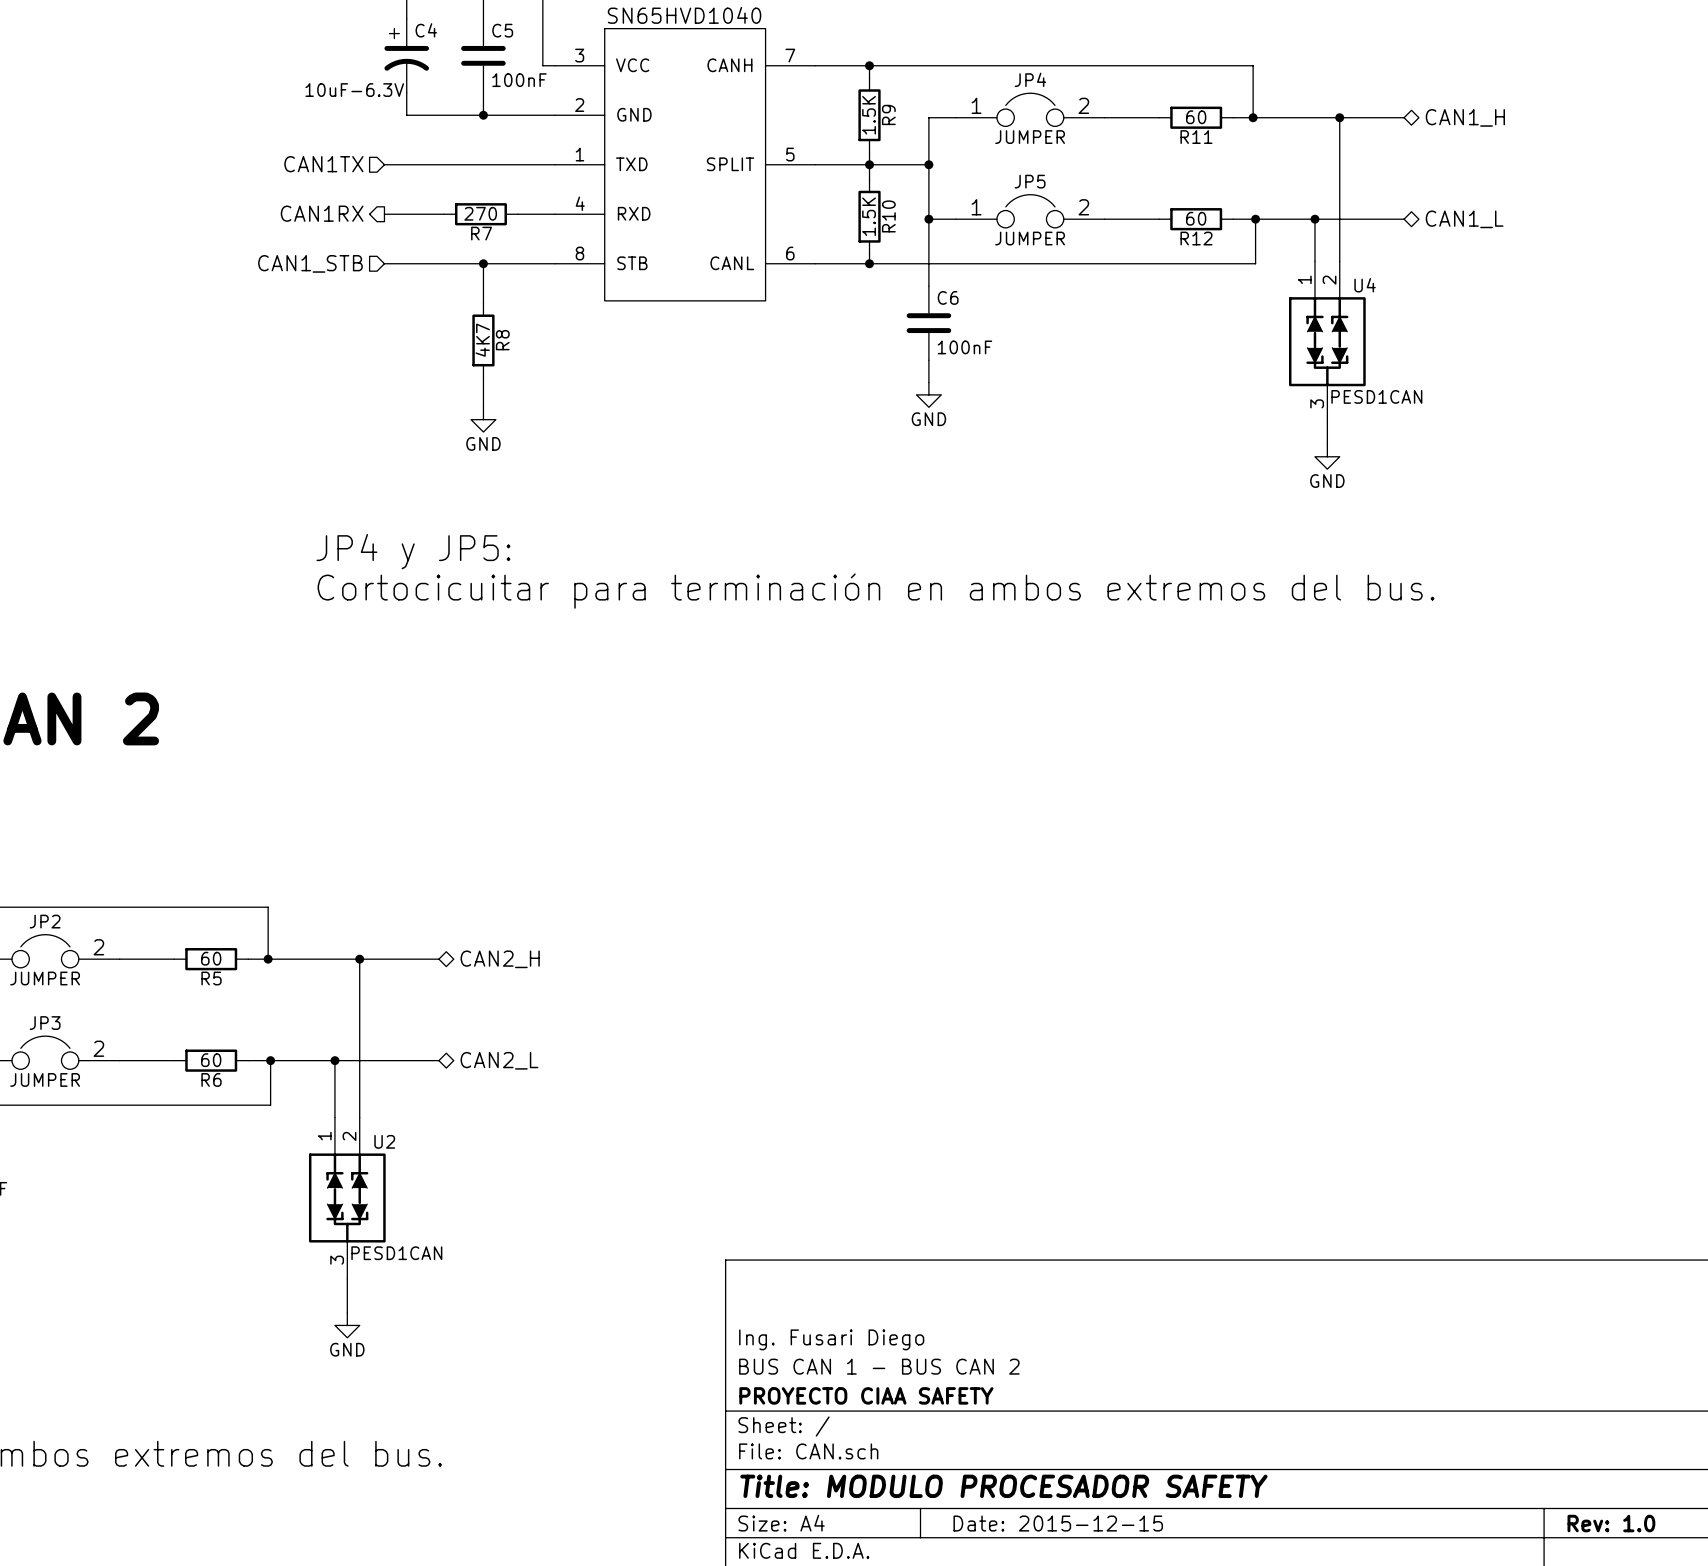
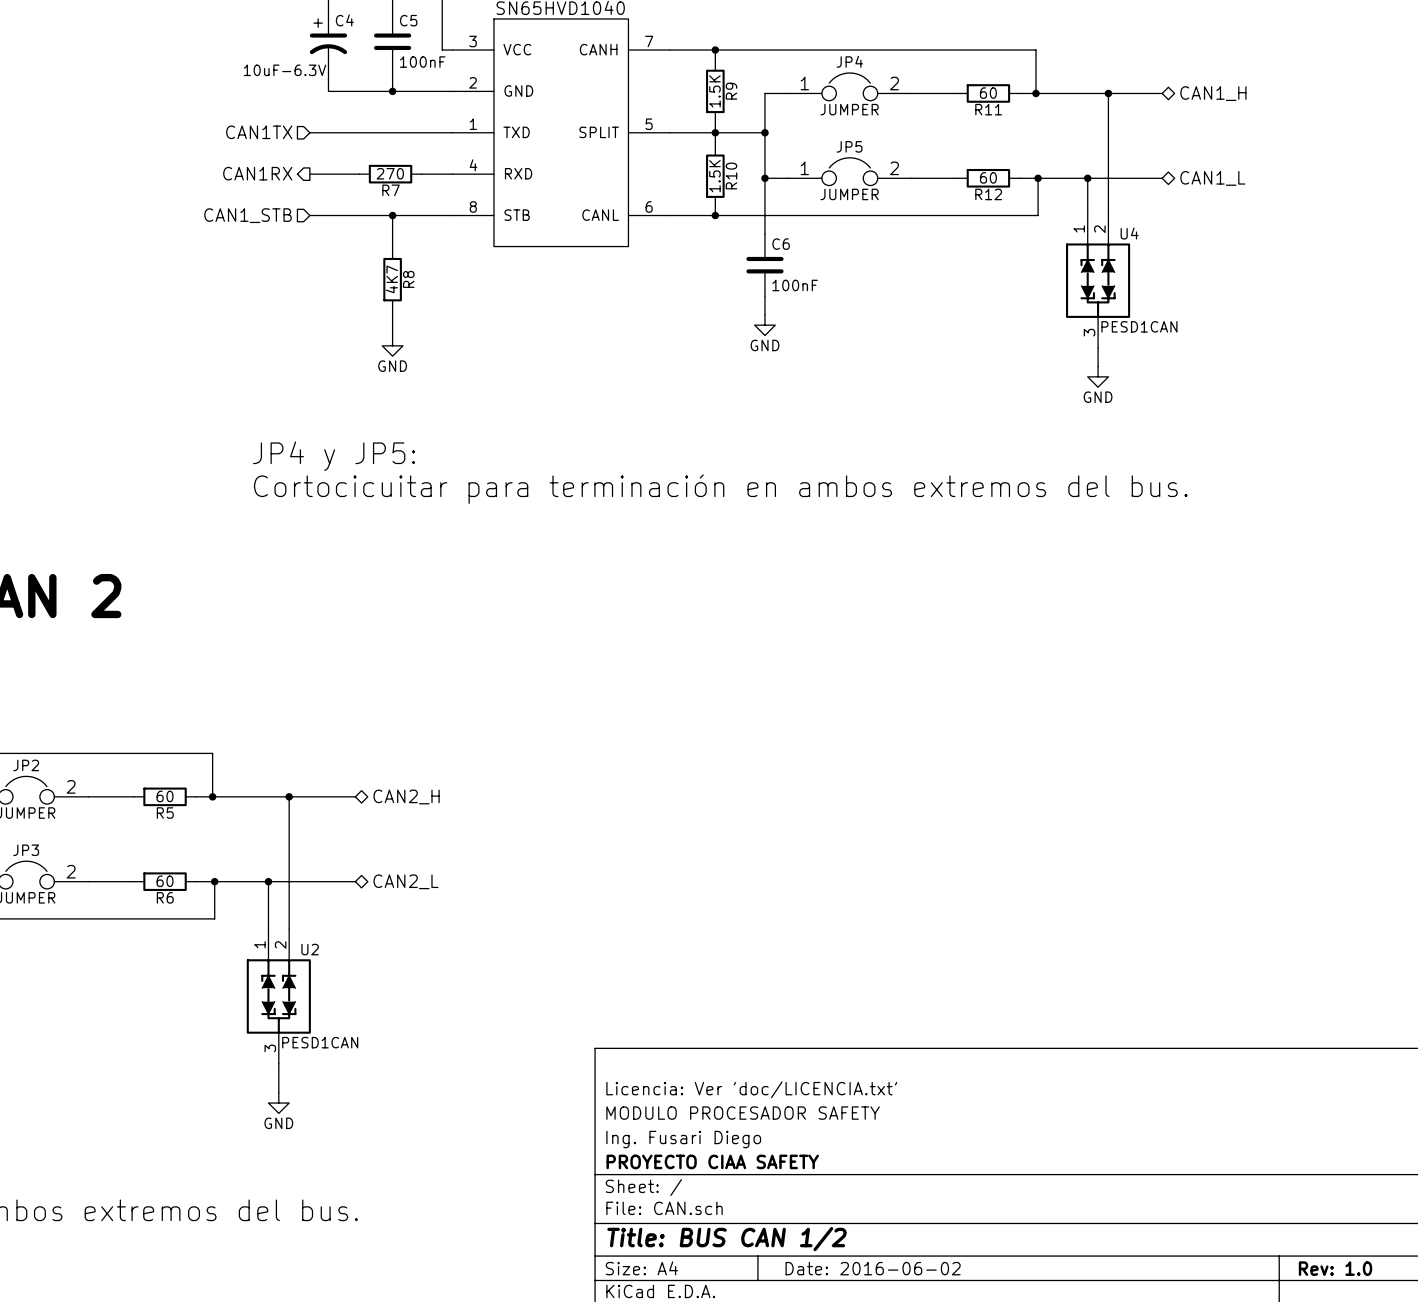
title block: none -> Licencia: Ver 'doc/LICENCIA.txt' (751, 1089)
title block: Ing. Fusari Diego (831, 1339) -> MODULO PROCESADOR SAFETY (743, 1113)
title block: BUS CAN 1 - BUS CAN 2 (879, 1366) -> Ing. Fusari Diego (683, 1139)
title block: Title: MODULO PROCESADOR SAFETY (1003, 1486) -> Title: BUS CAN 1/2 (727, 1239)
title block: Date: 2015-12-15 (1058, 1523) -> Date: 2016-06-02 (873, 1268)

